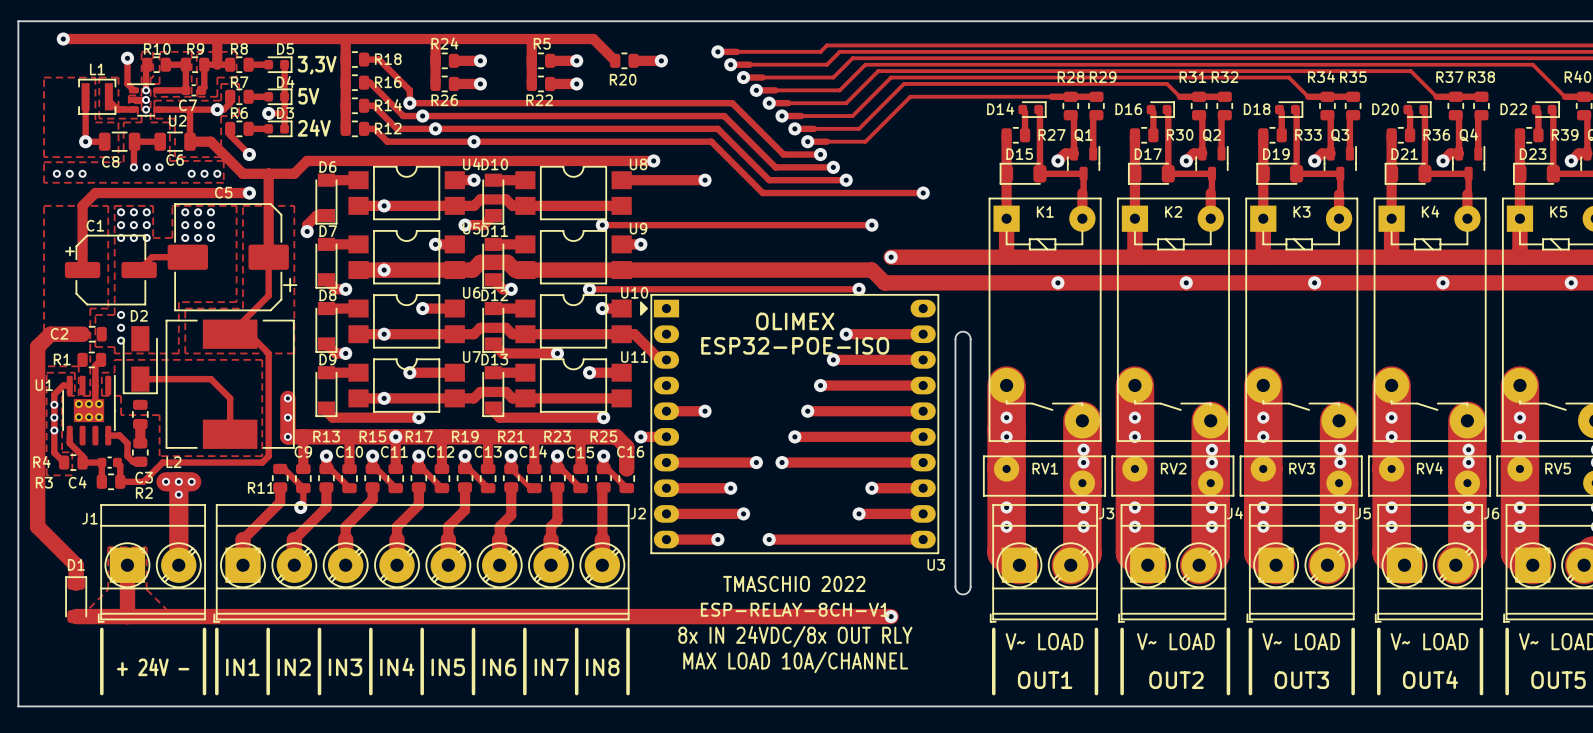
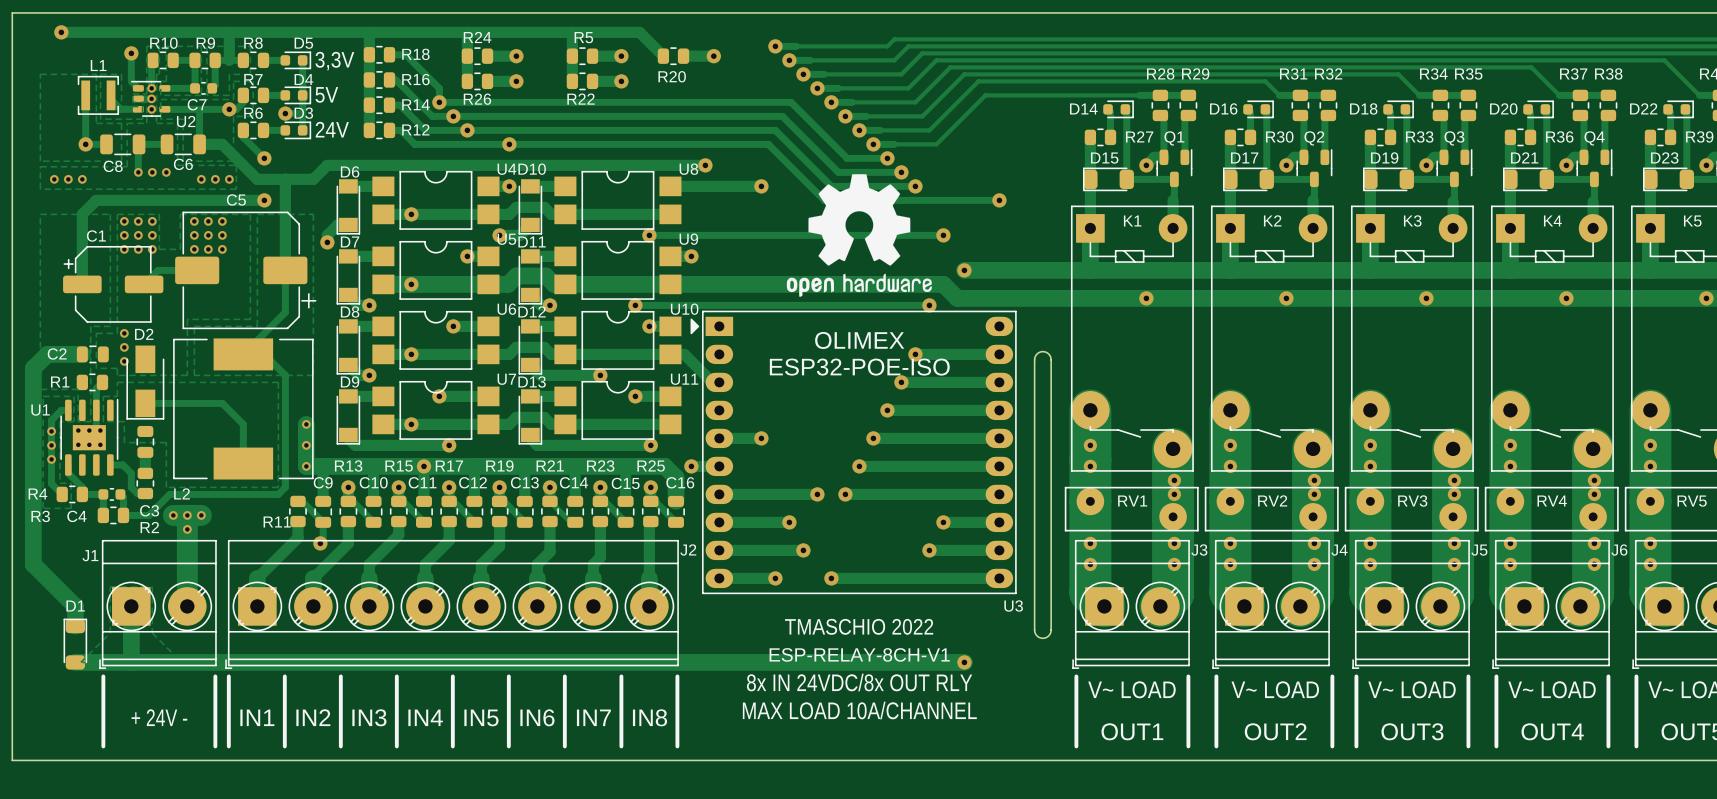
drawing: none -> [786, 174, 932, 297]

